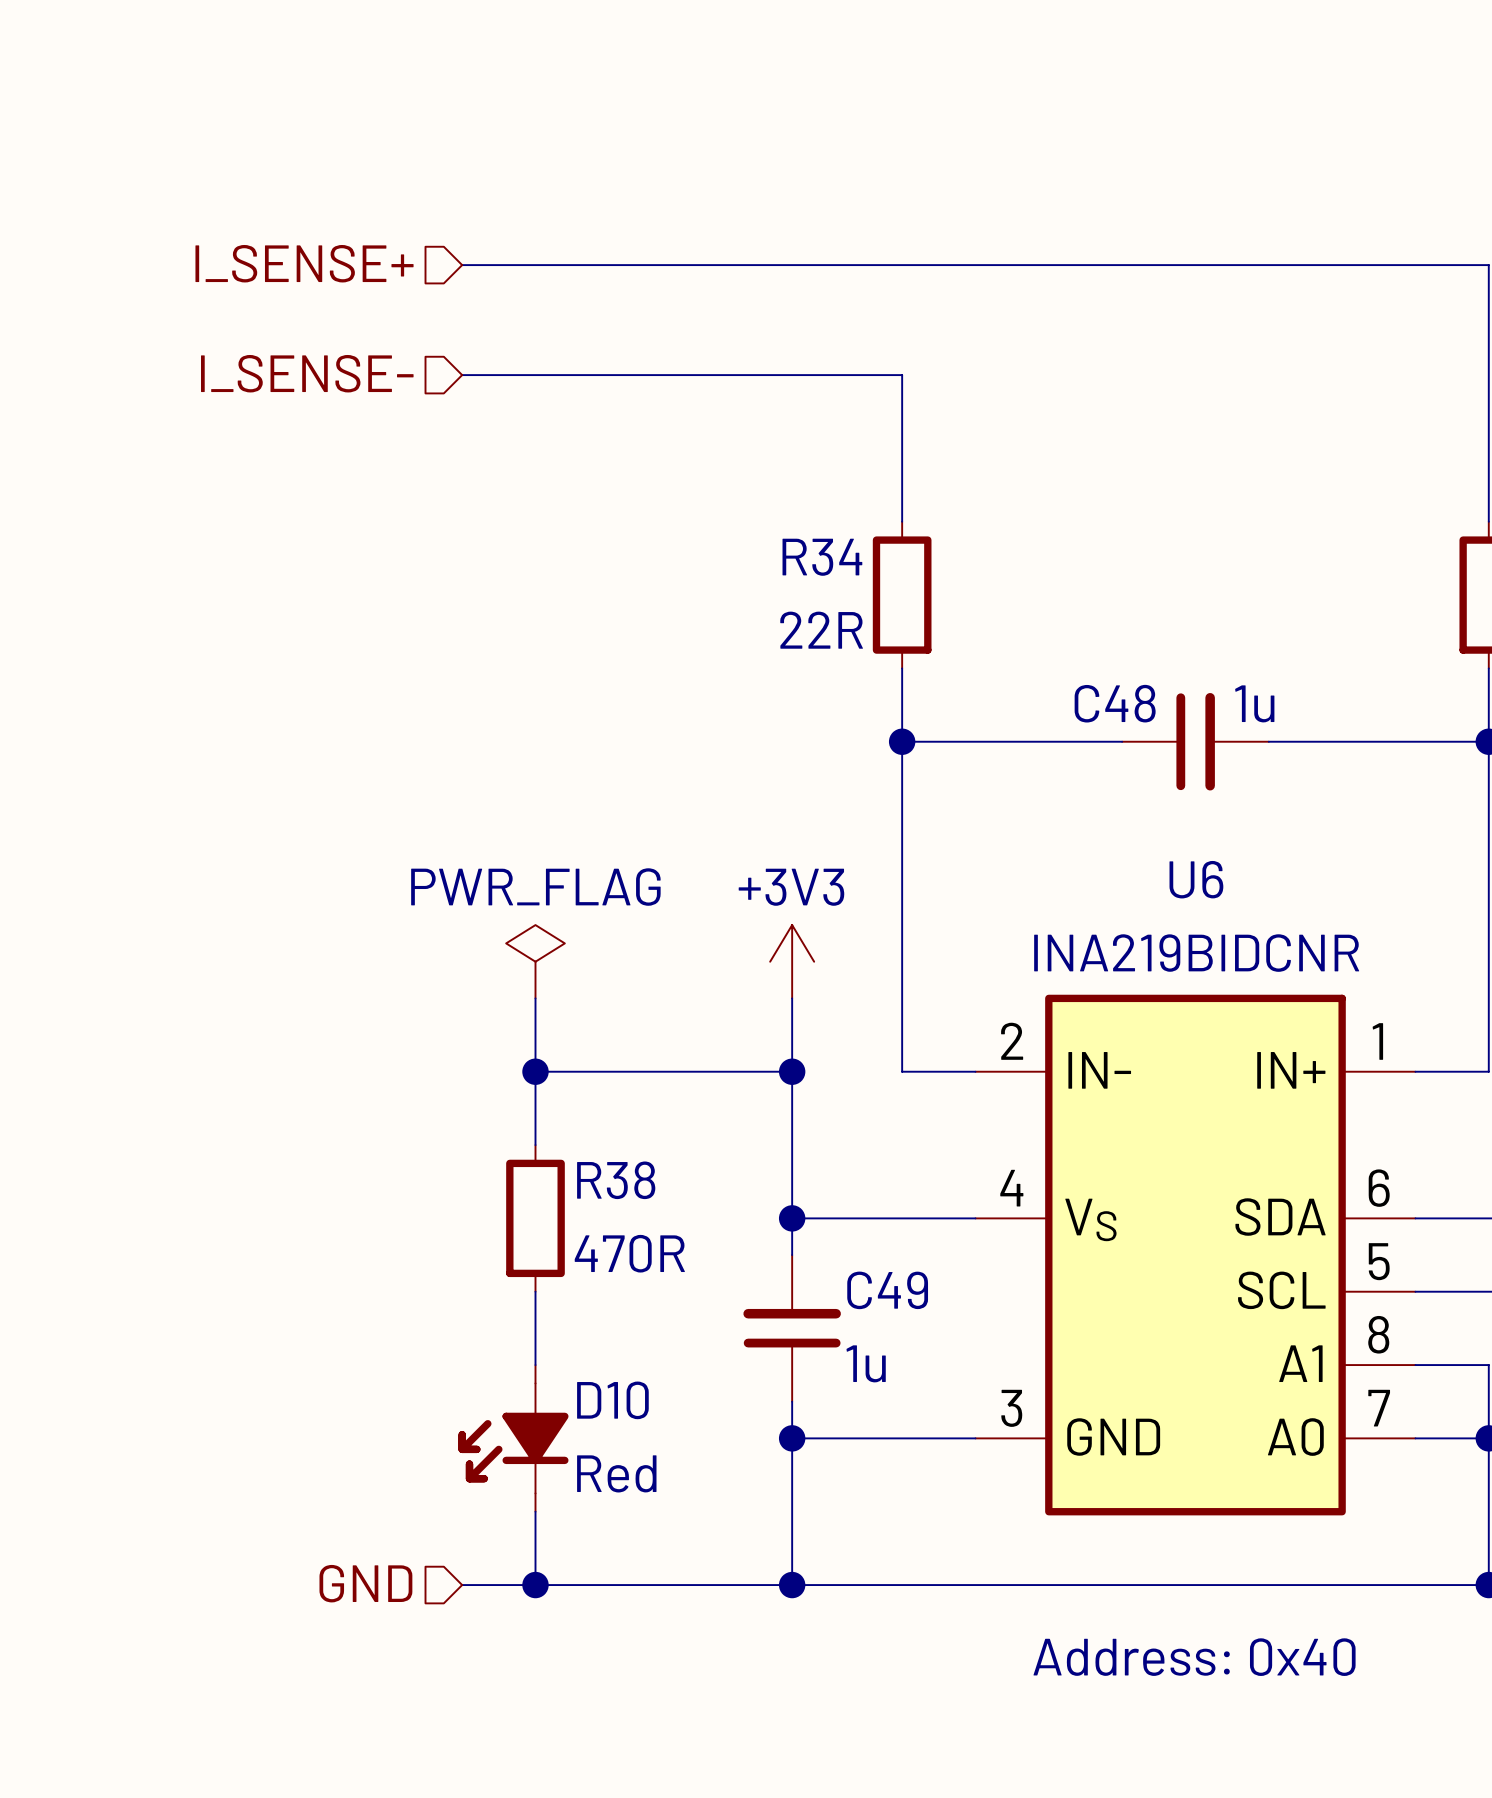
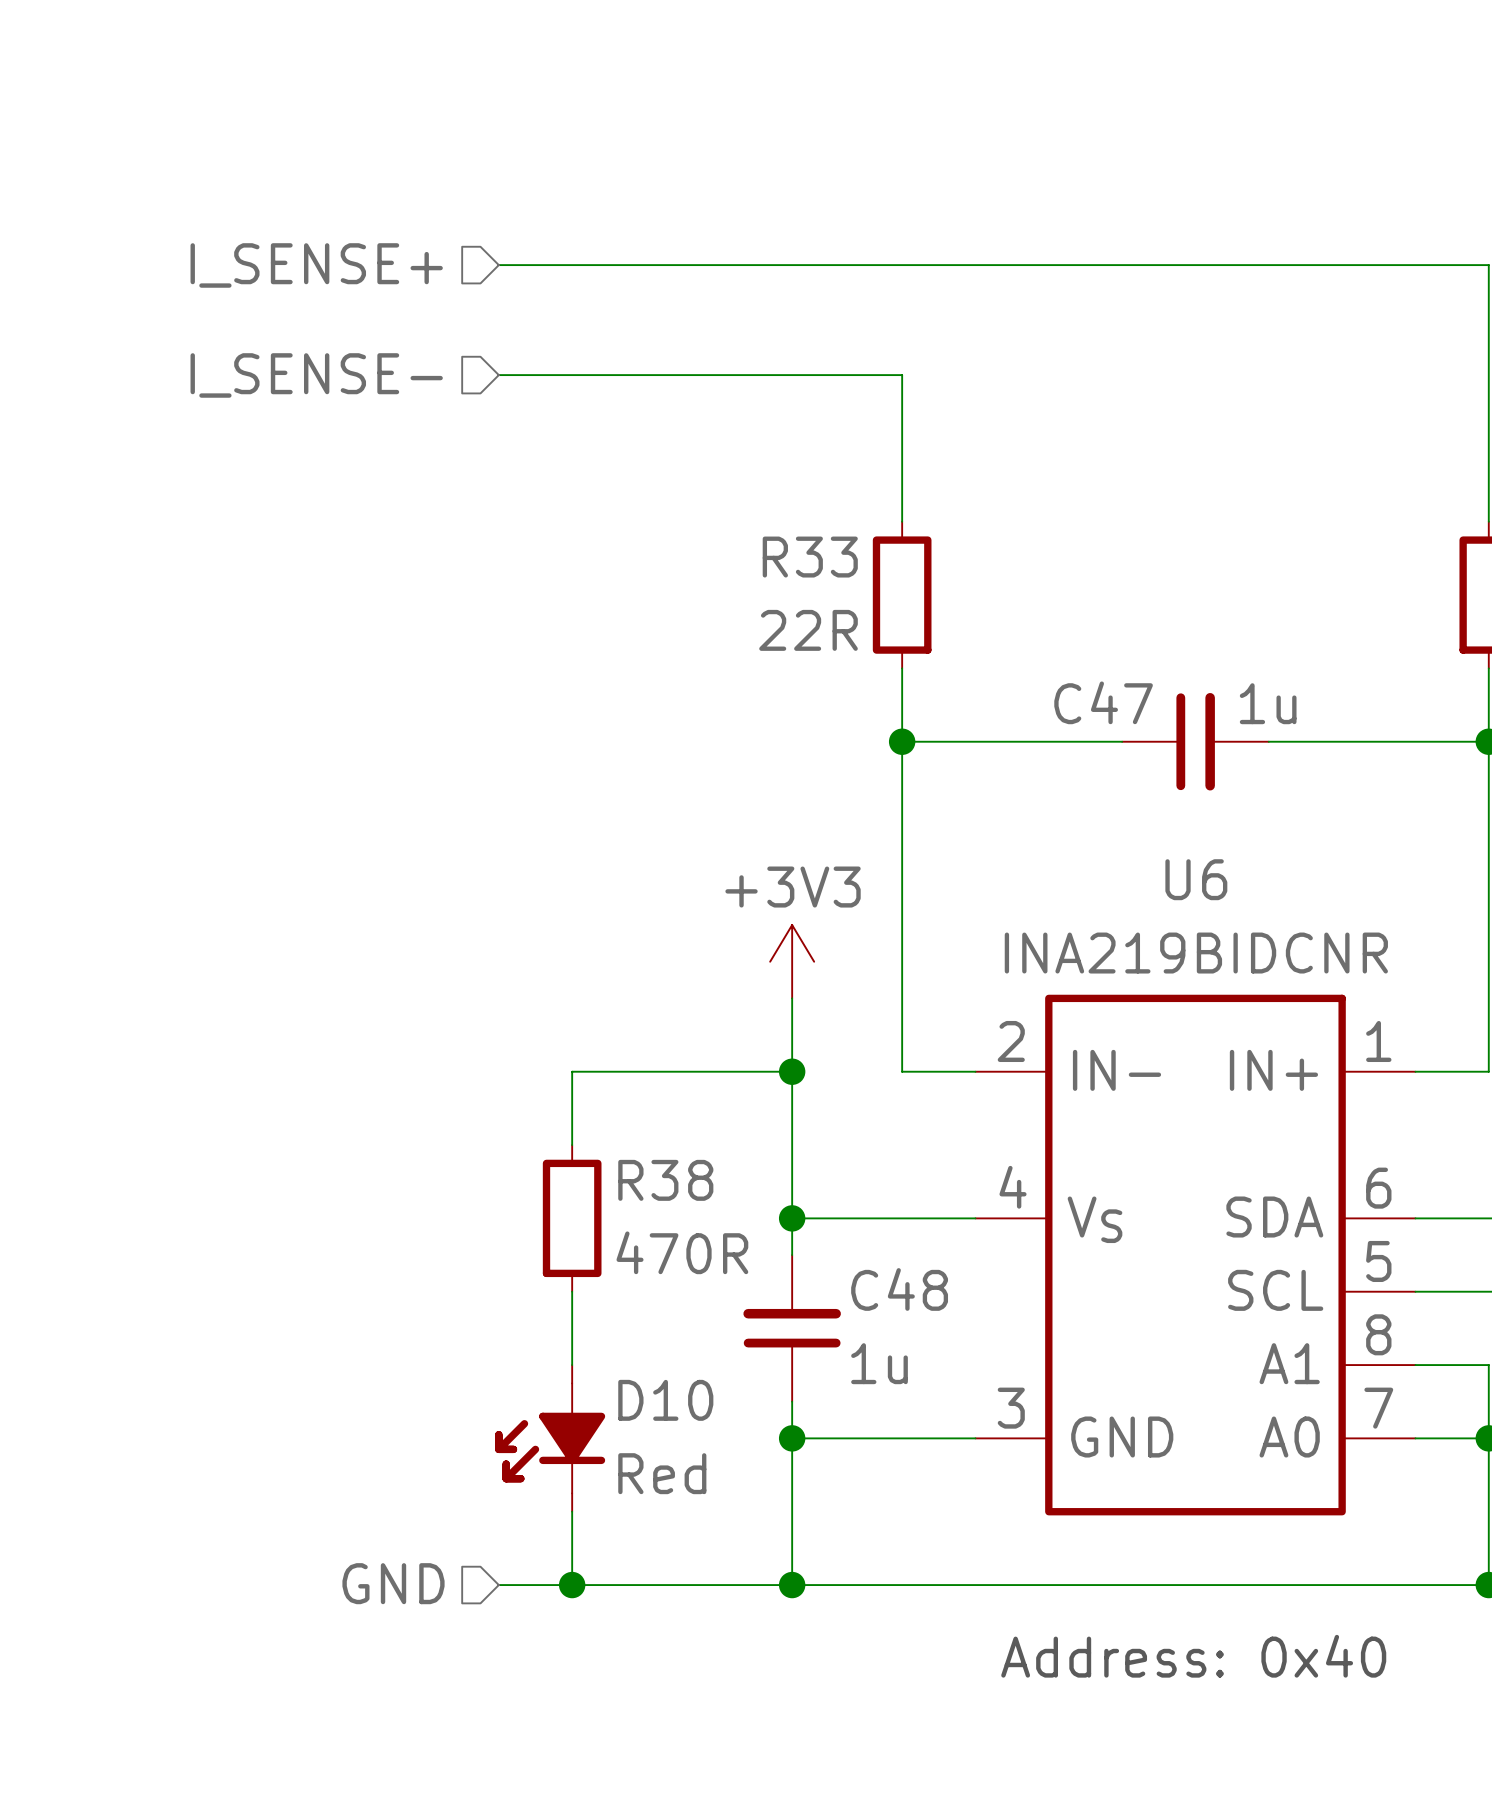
hierarchical label position: I_SENSE+ (304, 263) -> I_SENSE+ (316, 265)
wire: (462, 265) (498, 265) -> none
hierarchical label position: I_SENSE- (307, 373) -> I_SENSE- (316, 375)
wire: (462, 375) (498, 375) -> none
R34 name: R34 (822, 557) -> R33 (810, 557)
C48 name: C48 (1115, 703) -> C47 (1103, 702)
power symbol: PWR_FLAG (535, 961) -> none
wire: (535, 998) (535, 1145) -> none
wire: (535, 1071) (572, 1071) -> (572, 1145) (572, 1071)
junction: (535, 1071) -> none
R38 position: (535, 1218) -> (572, 1218)
C49 name: C49 (887, 1290) -> C48 (899, 1289)
wire: (535, 1291) (535, 1365) -> (572, 1291) (572, 1365)
D10 position: (513, 1438) -> (550, 1438)
wire: (535, 1511) (535, 1585) -> (572, 1511) (572, 1585)
hierarchical label position: GND (365, 1583) -> GND (393, 1583)
wire: (462, 1585) (498, 1585) -> none
junction position: (535, 1585) -> (572, 1585)

